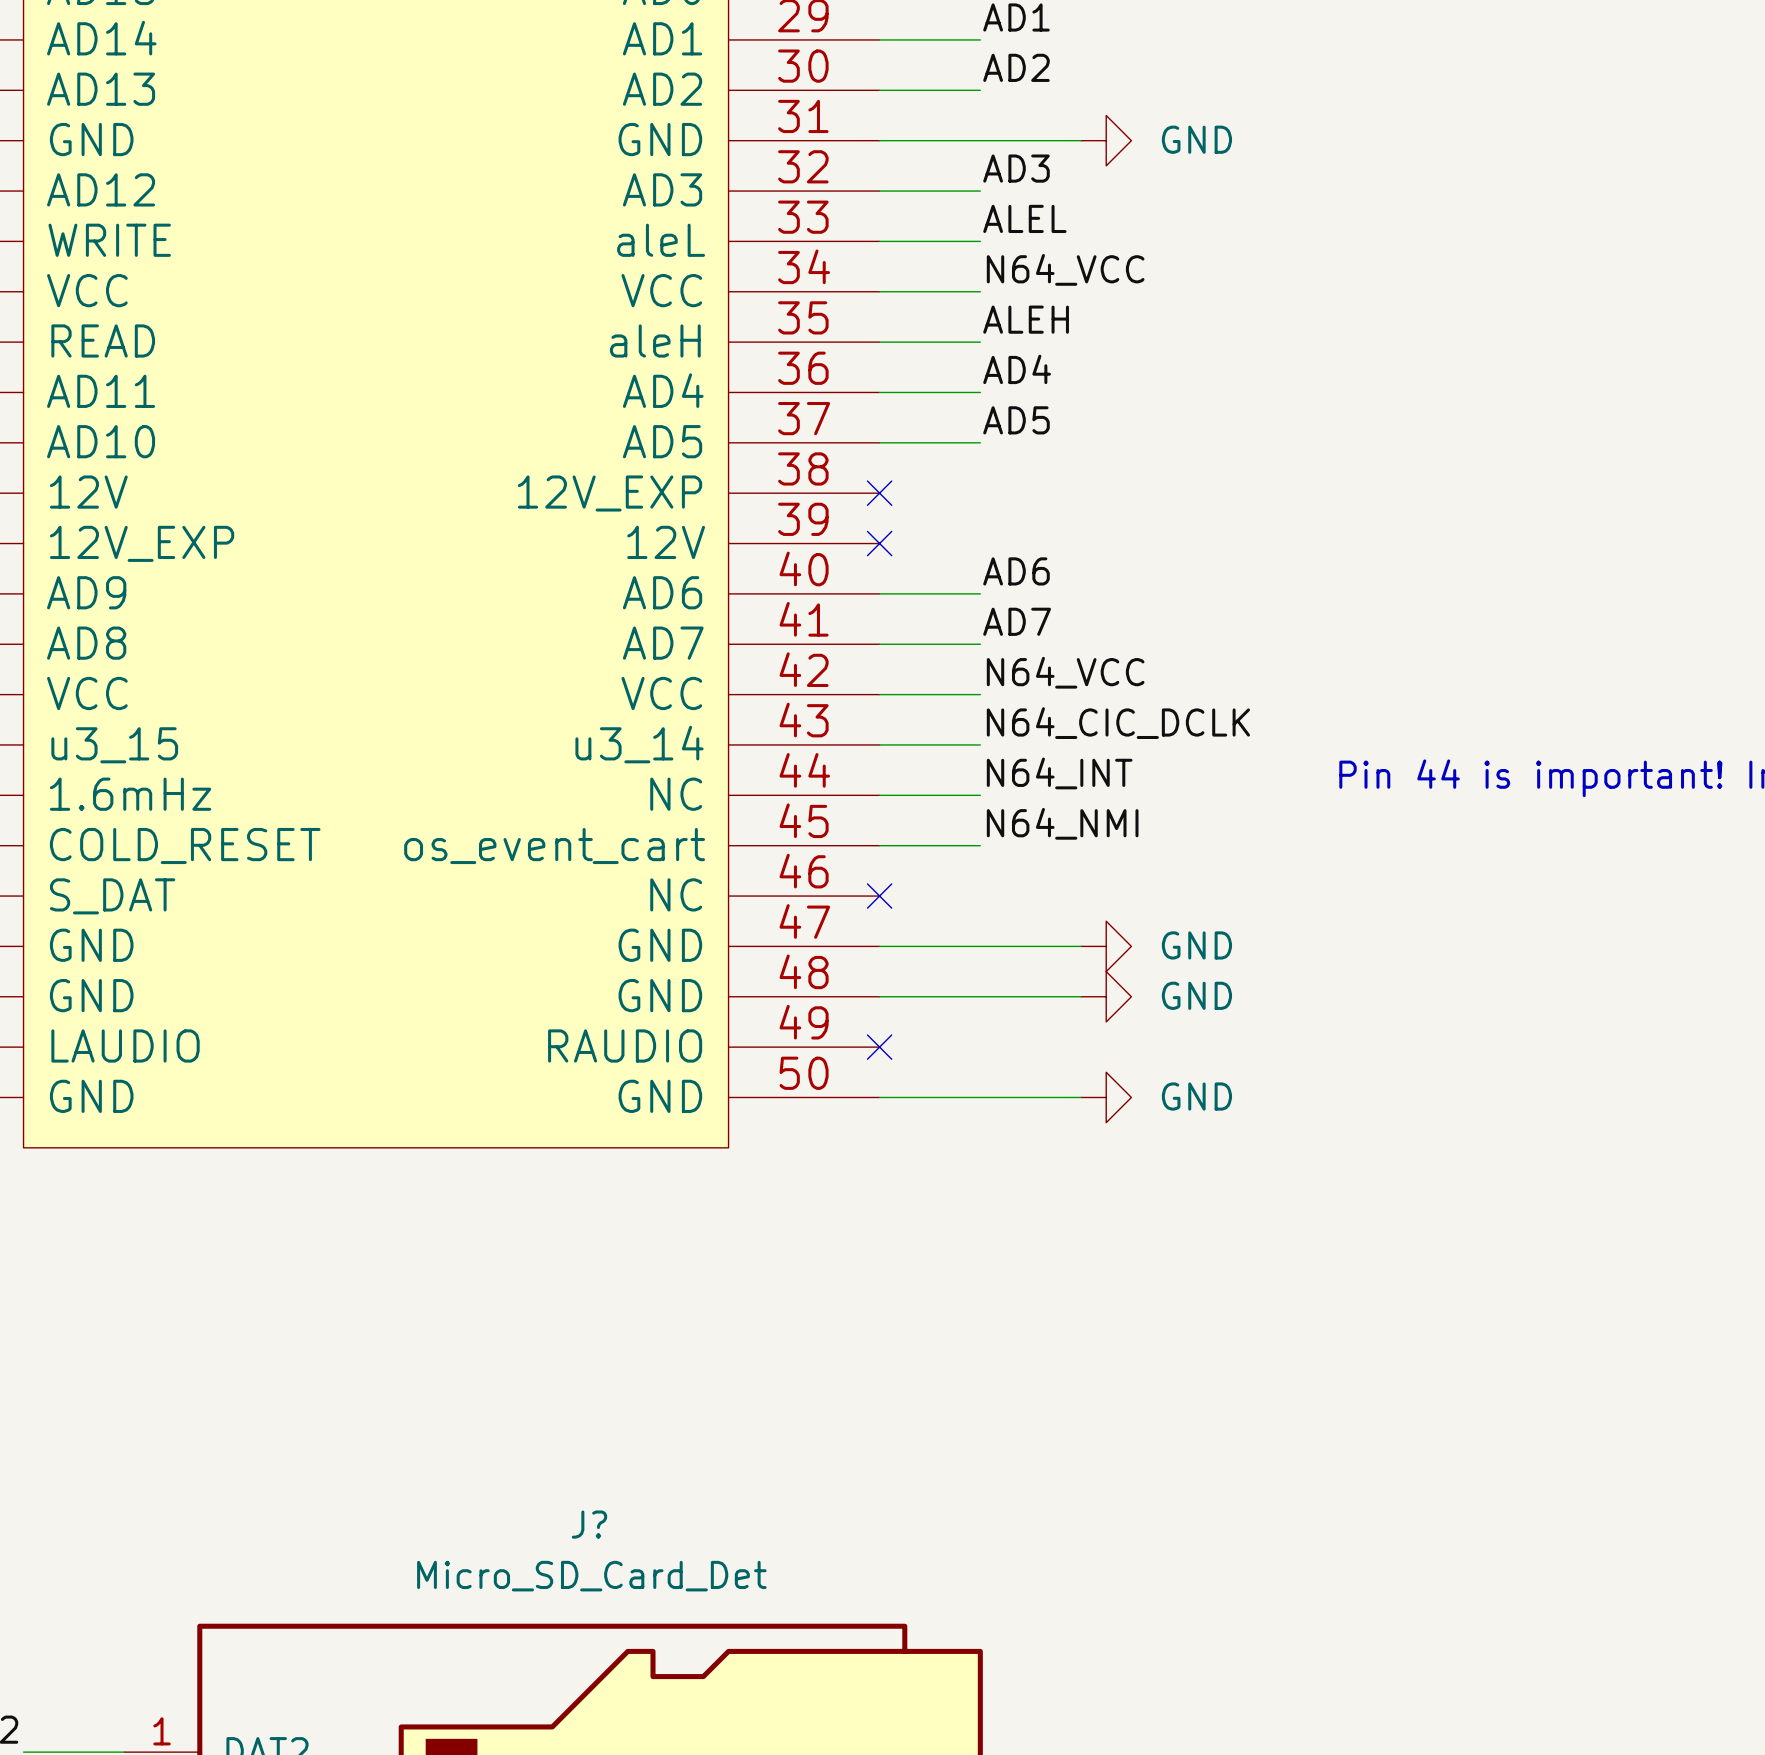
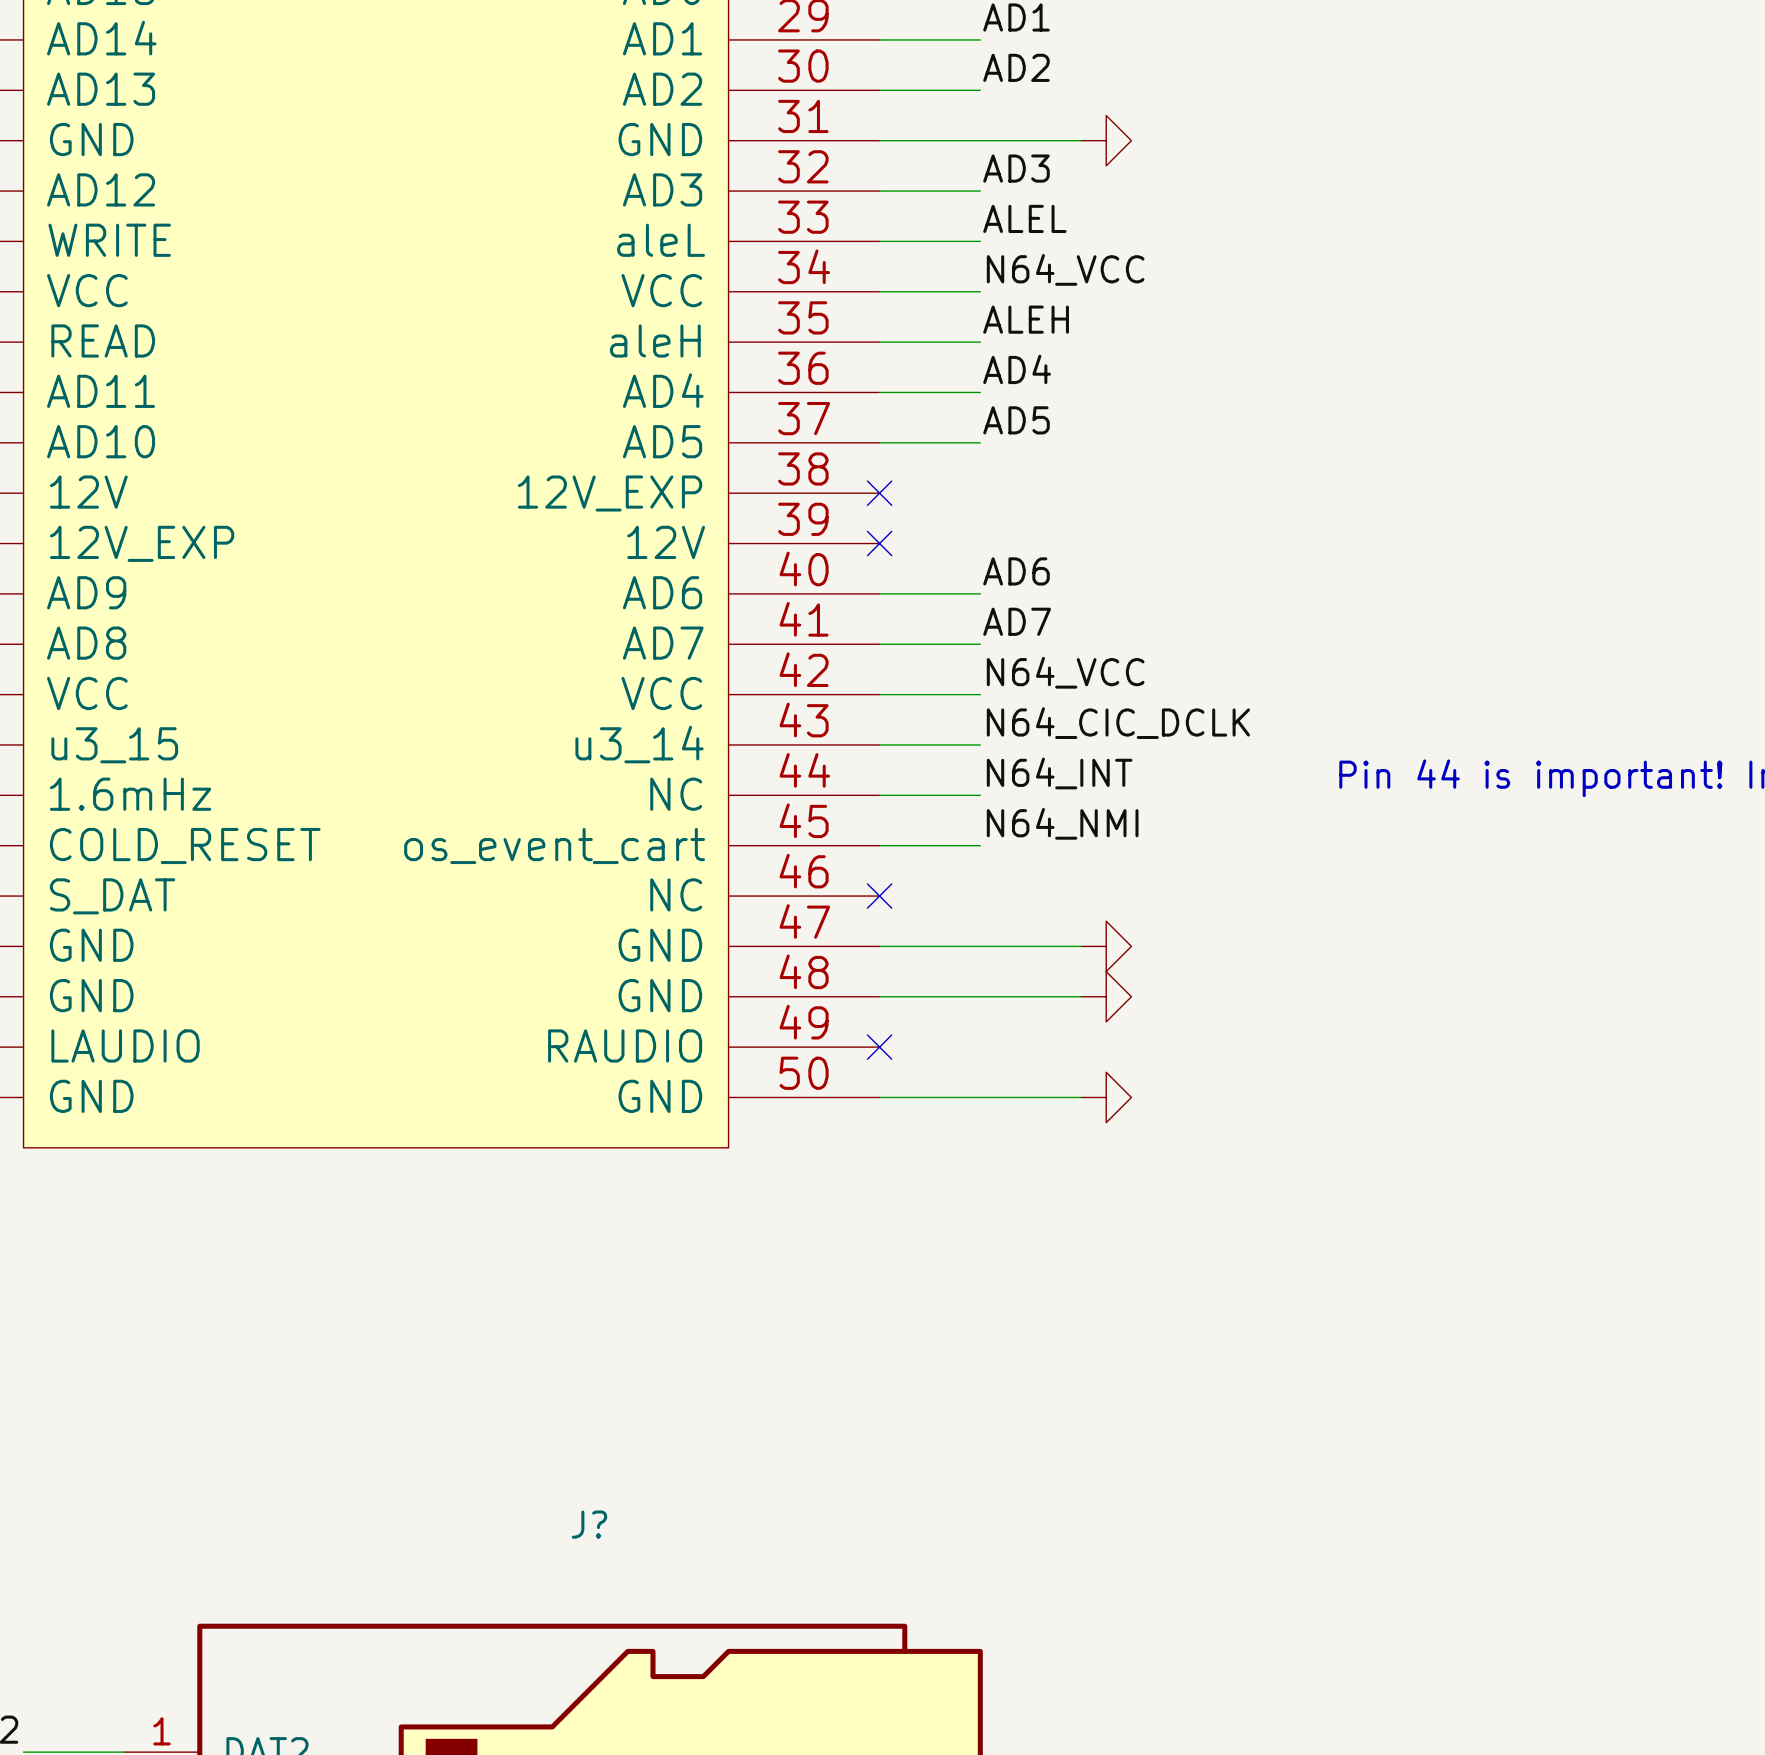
power symbol text: GND (1196, 139) -> none
power symbol text: GND (1196, 945) -> none
power symbol text: GND (1196, 995) -> none
power symbol text: GND (1196, 1096) -> none
J? value: Micro_SD_Card_Det (591, 1576) -> none

